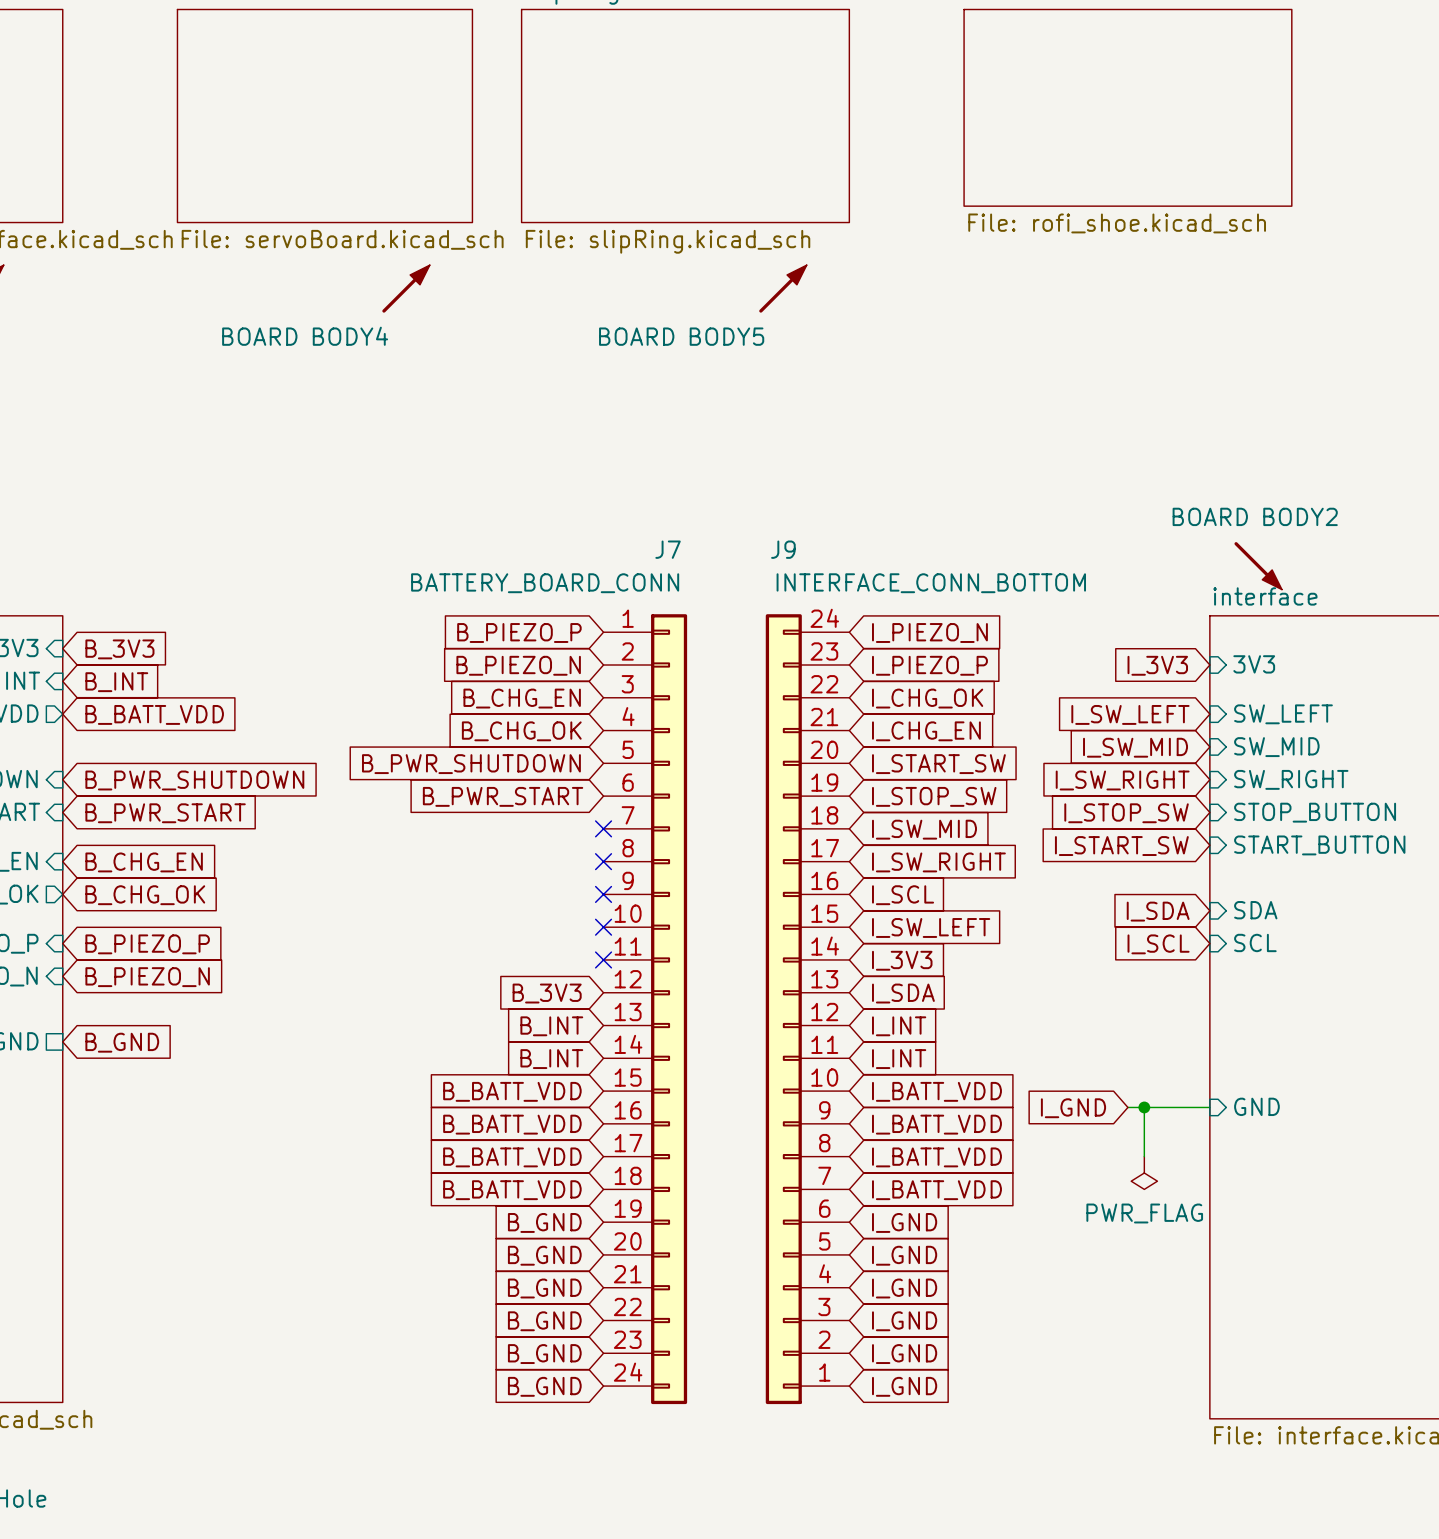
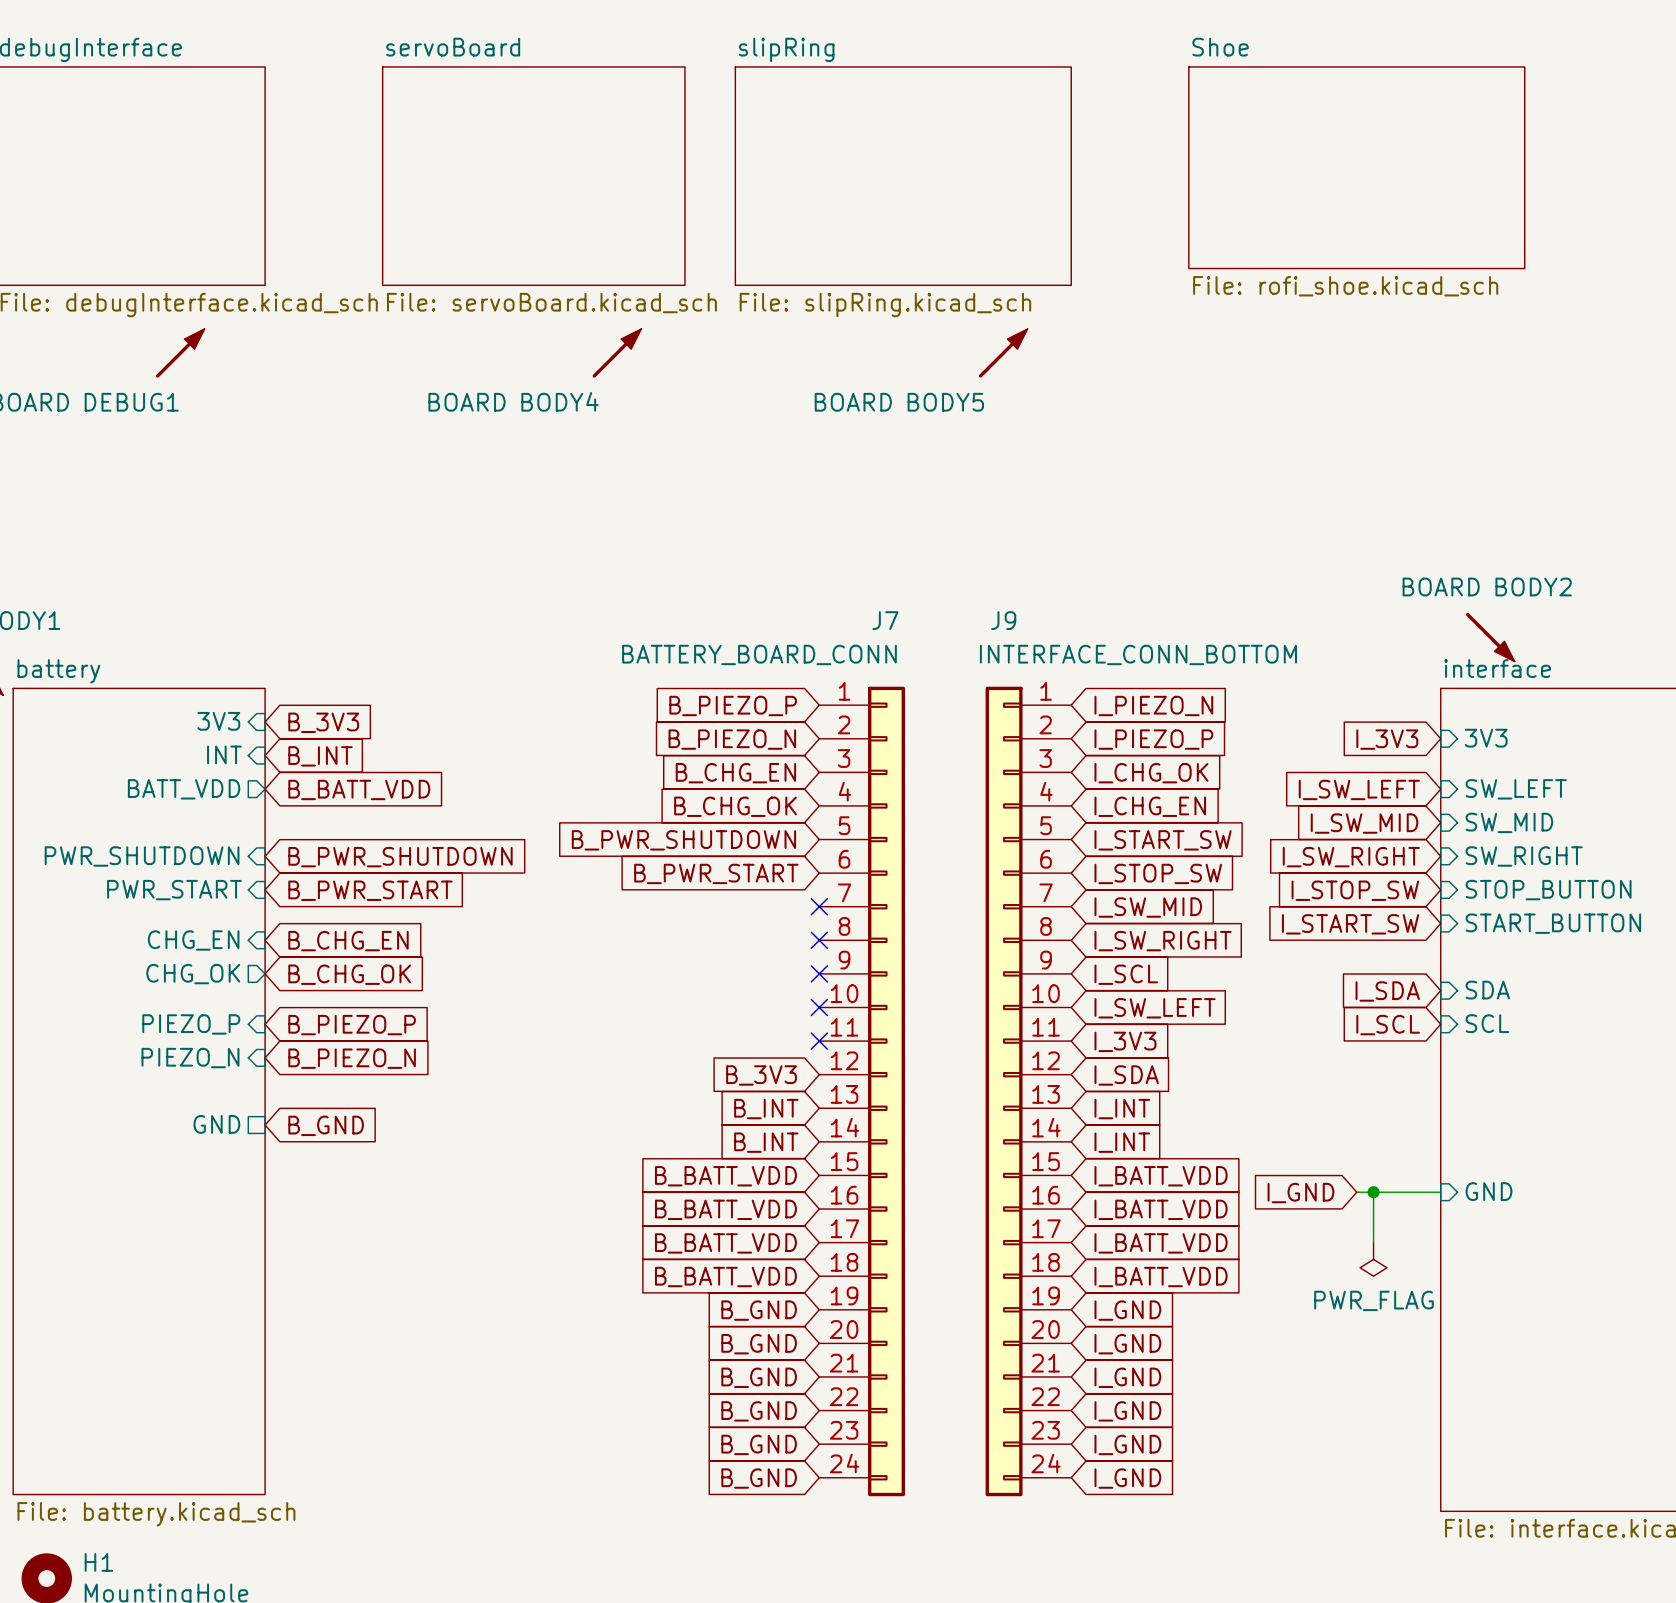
J9 flip: as is (783, 1009) -> up-down (1004, 1091)

